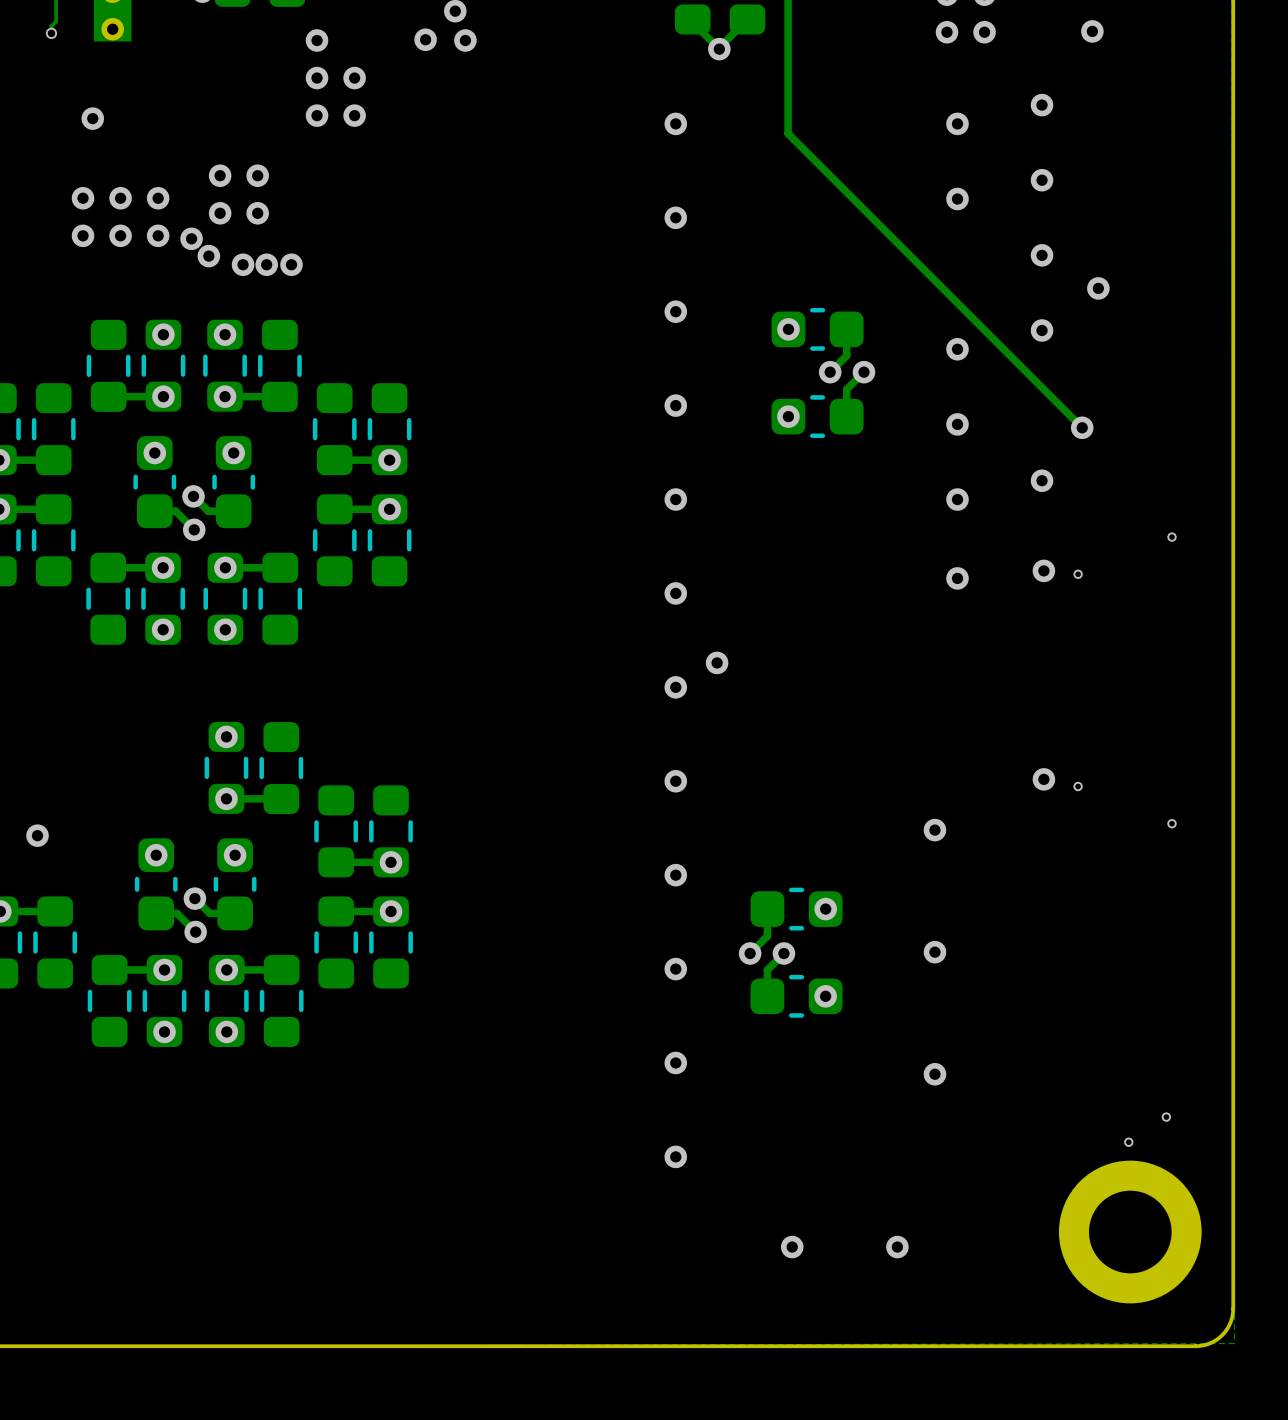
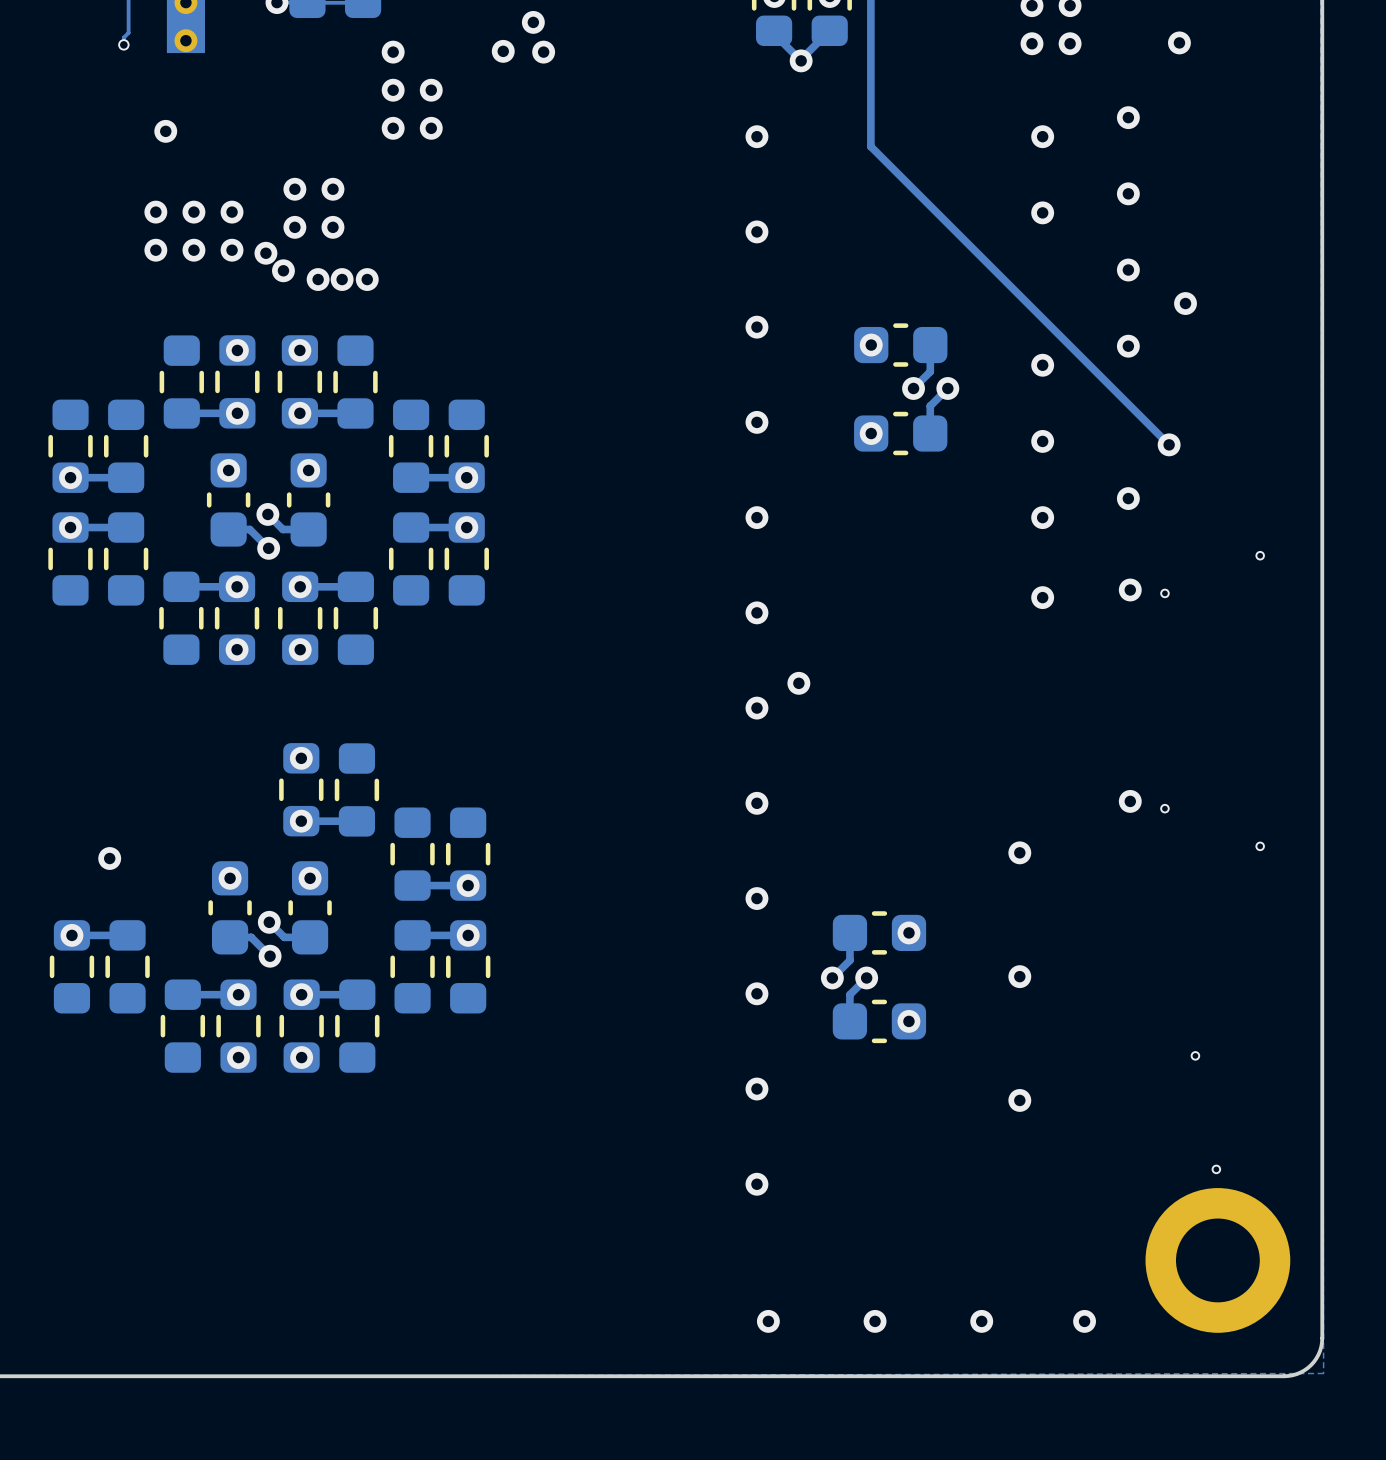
via position: (1166, 1117) -> (1195, 1055)
via position: (792, 1247) -> (875, 1321)
via position: (897, 1247) -> (981, 1321)
via: none -> (768, 1321)
via: none -> (1084, 1321)

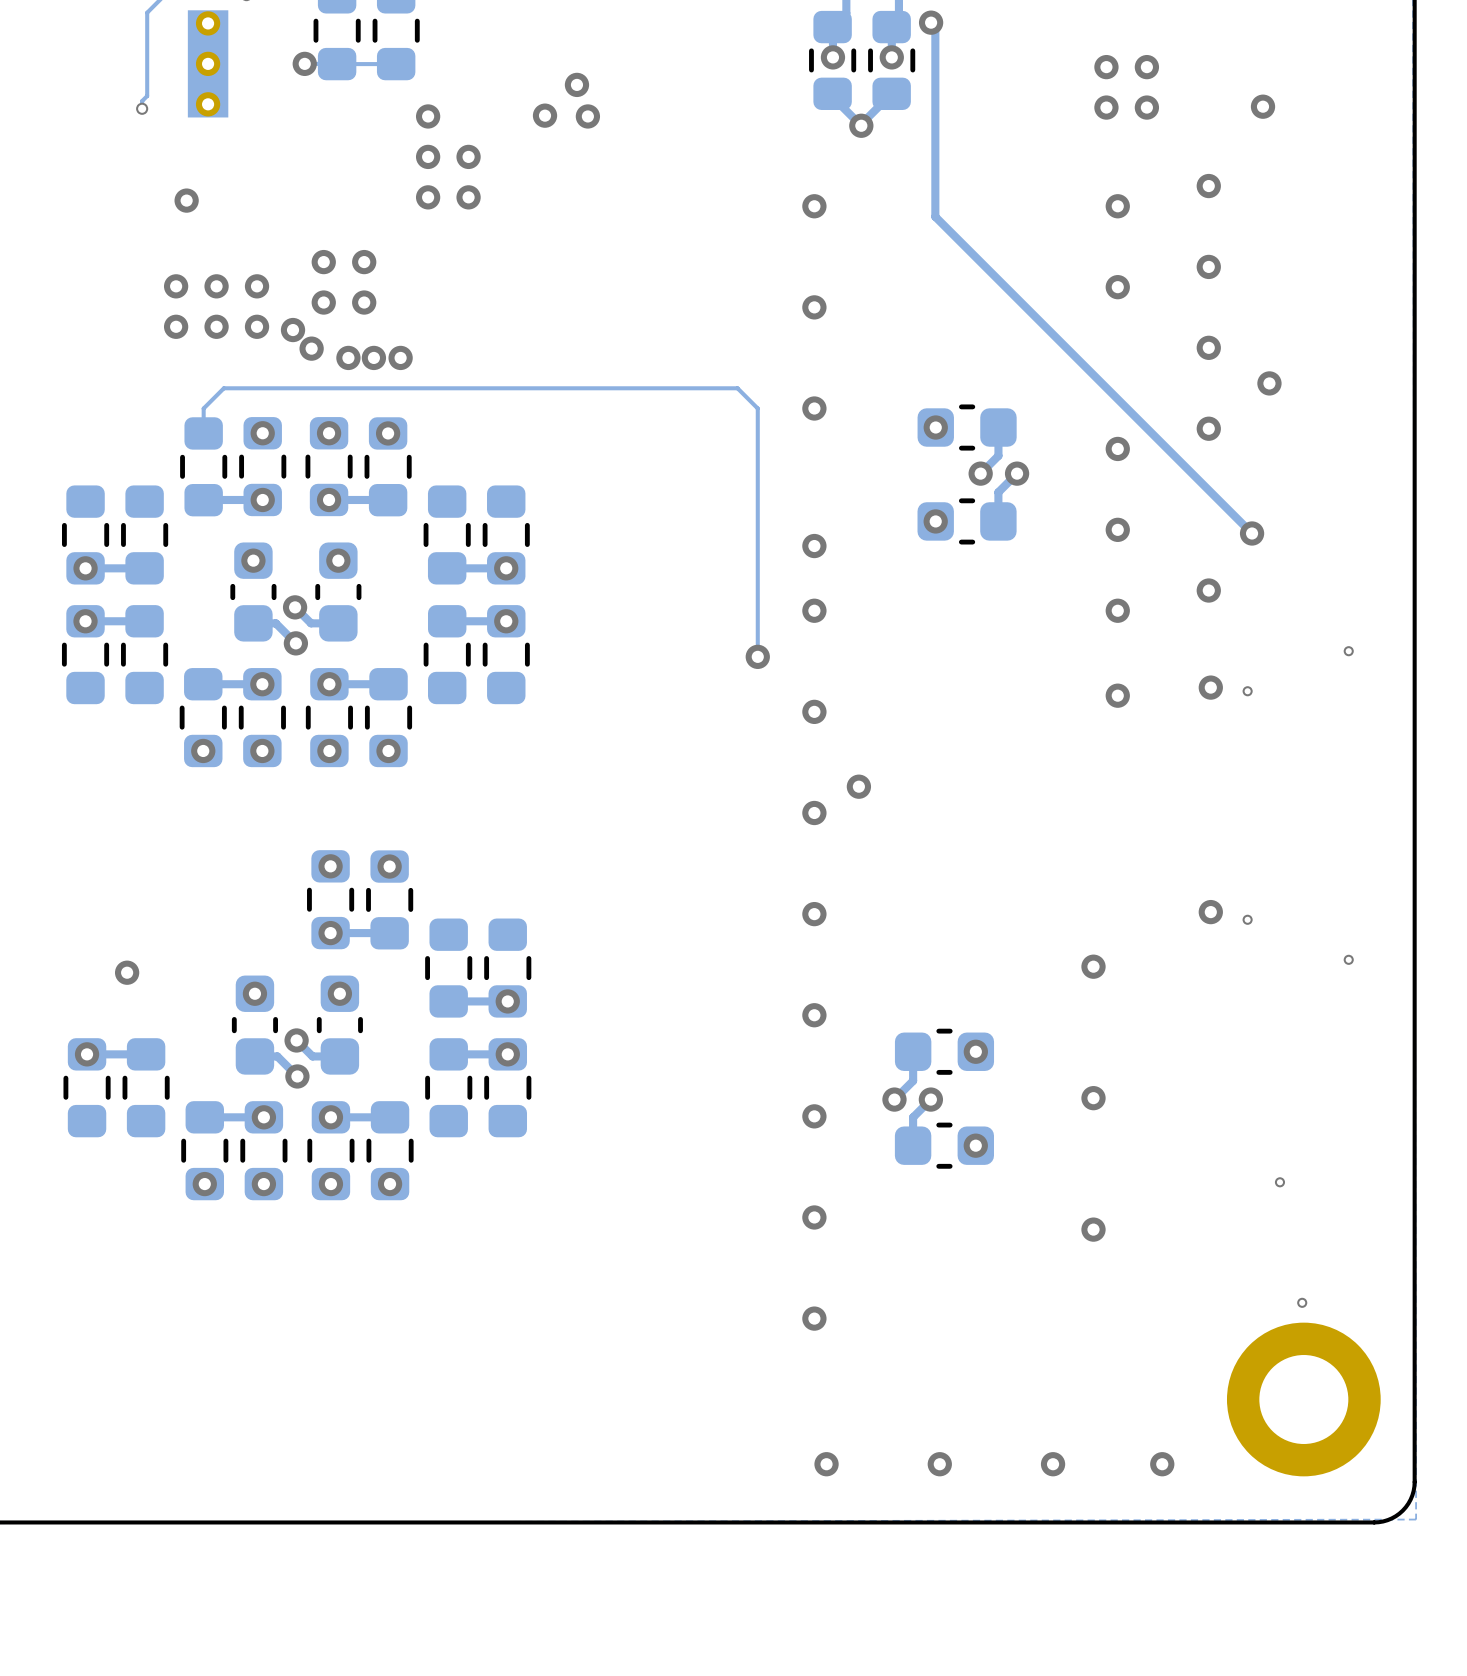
track: none -> (203, 433) (203, 408) (223, 388) (737, 388) (757, 408) (757, 656)
via: none -> (388, 433)
via position: (756, 422) -> (814, 546)
via: none -> (757, 656)
via: none -> (203, 750)
via: none -> (388, 750)
via: none -> (389, 866)
via: none -> (204, 1184)
via: none -> (390, 1184)

